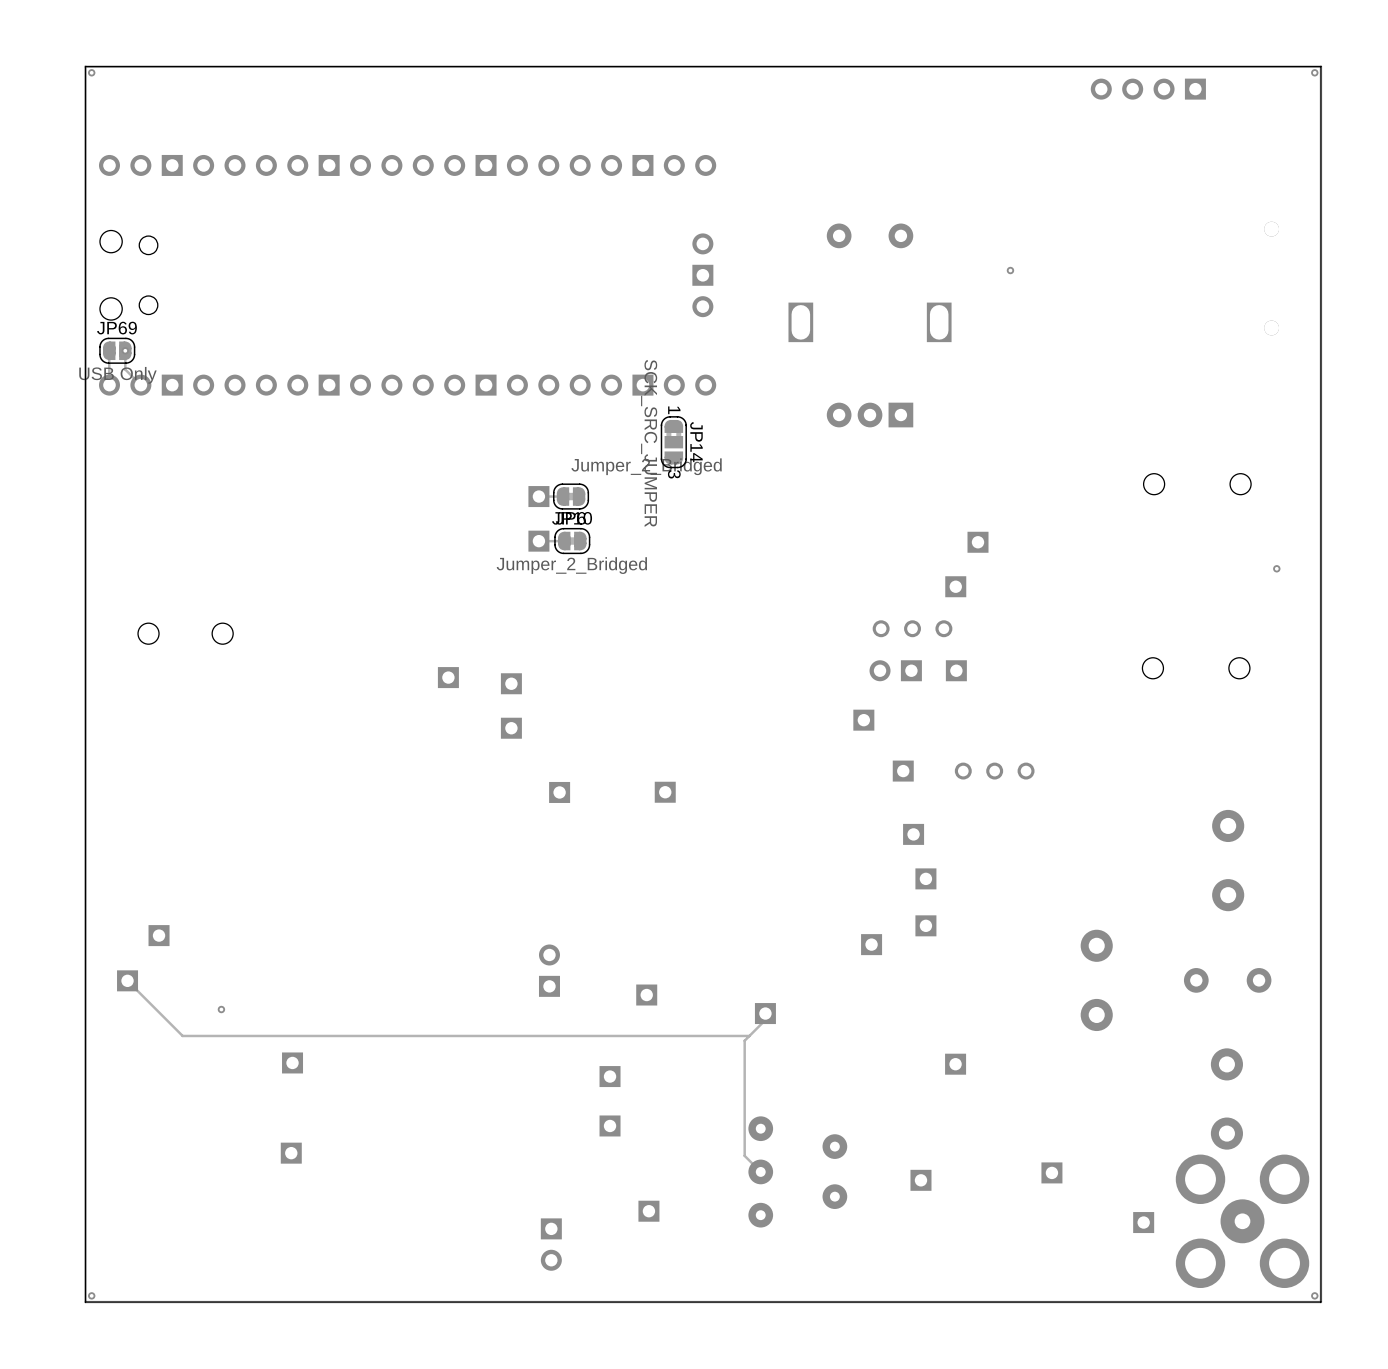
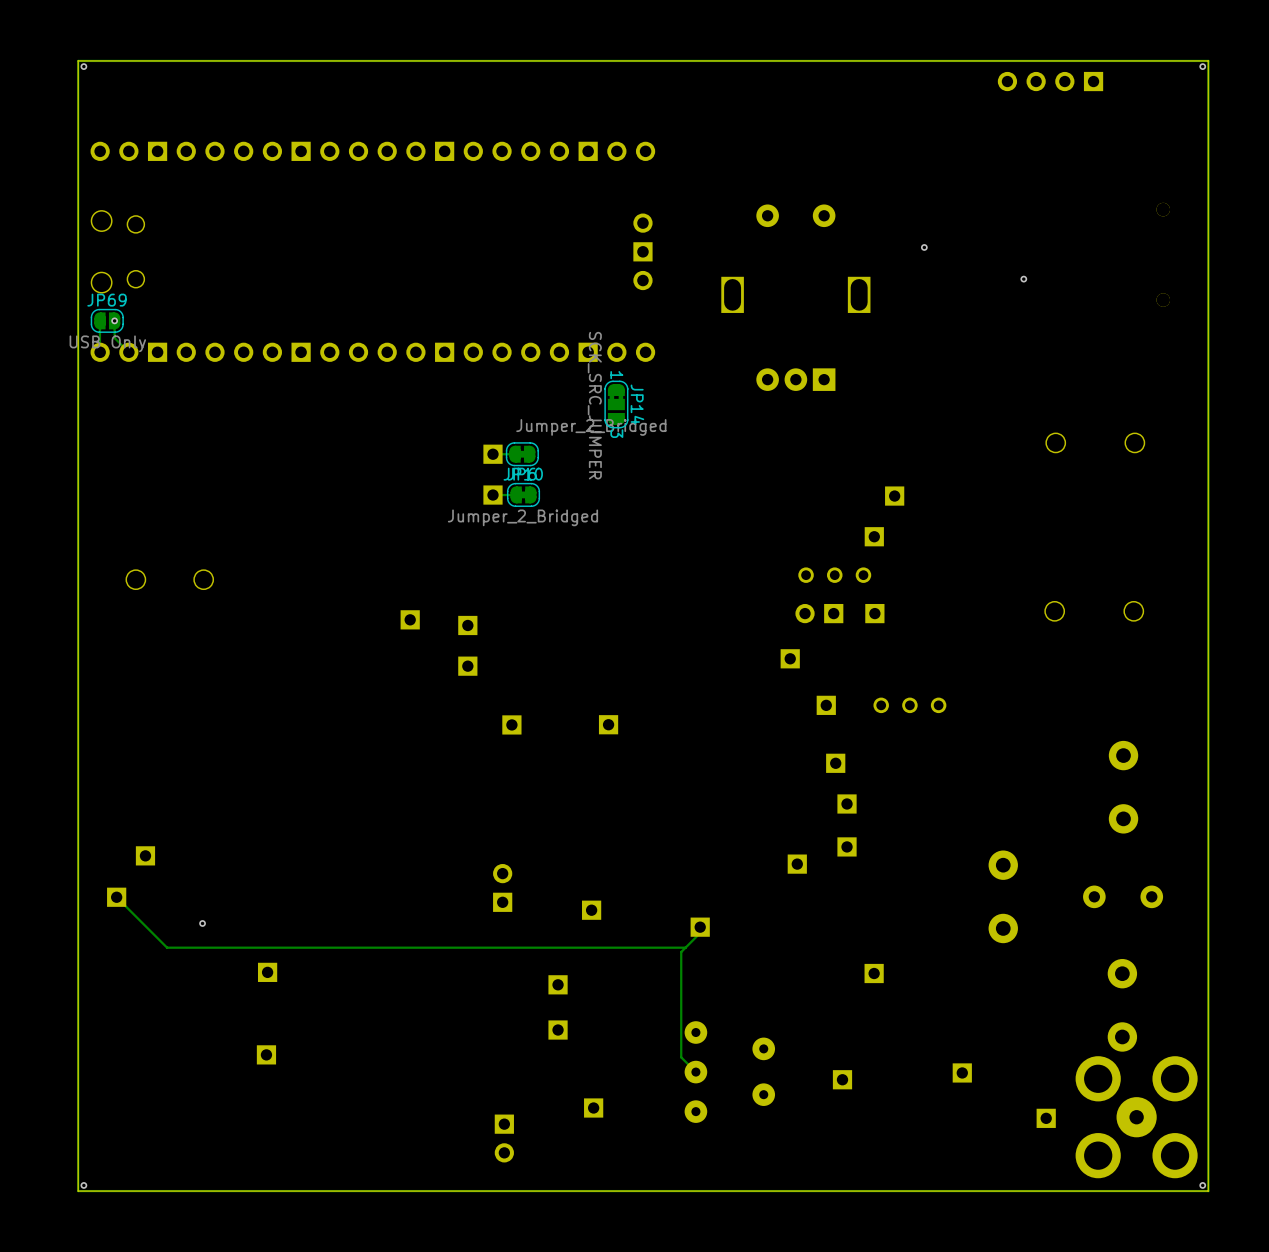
via: none -> (1023, 279)
via: (1276, 568) -> none

